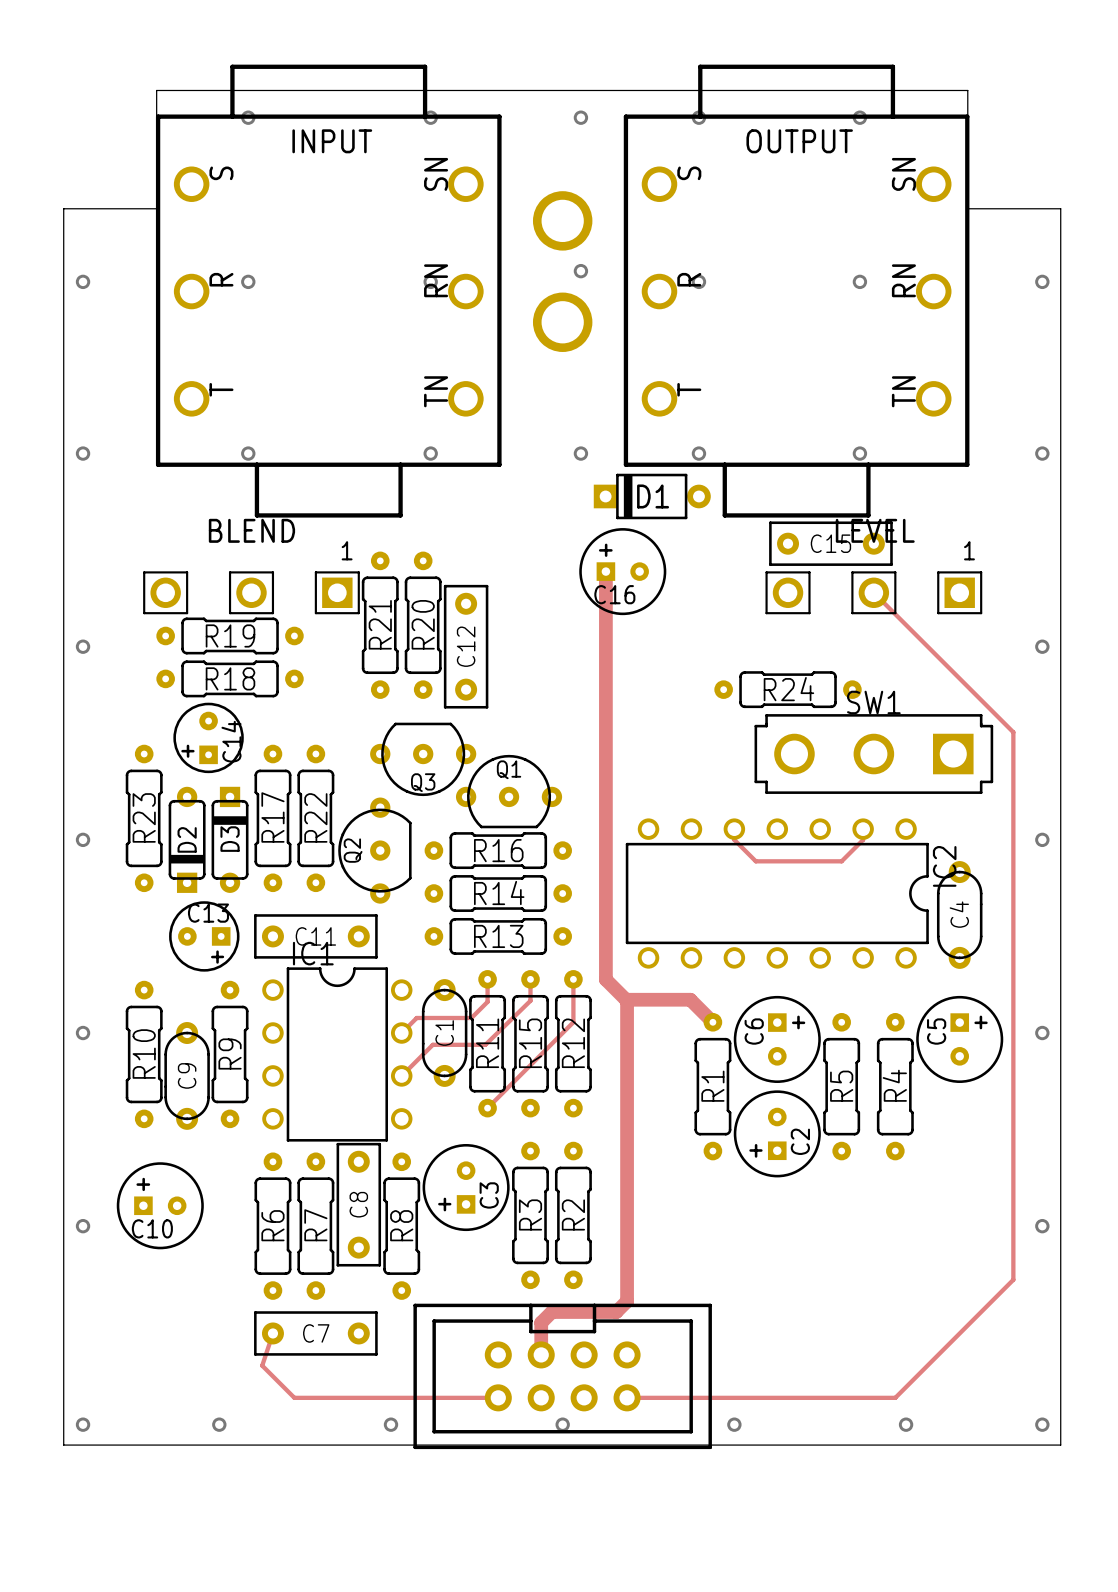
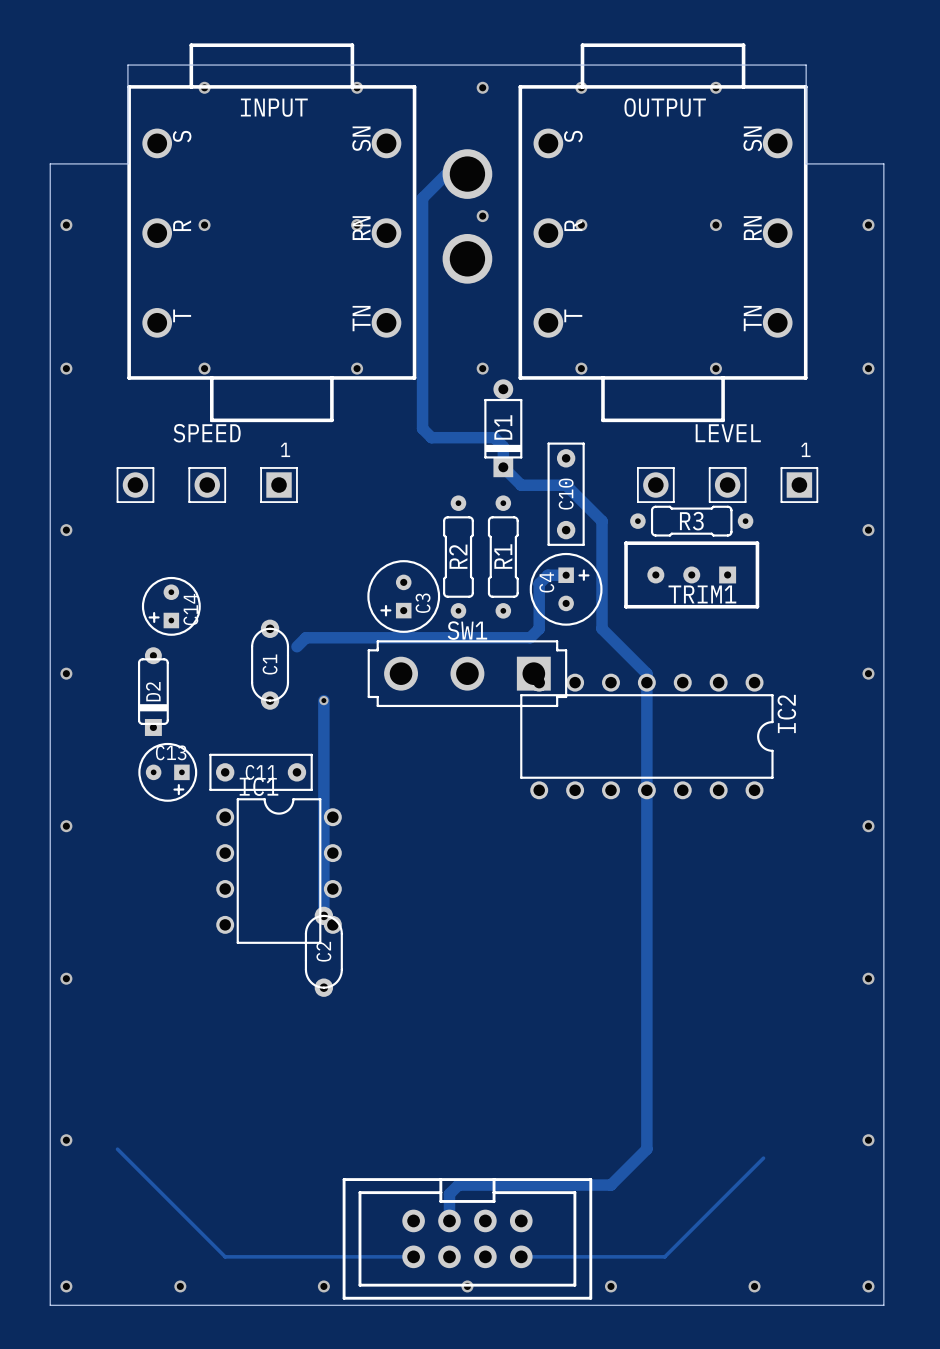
drawing: [63, 90, 1061, 1446] -> none
drawing: none -> [50, 65, 884, 1306]
track: none -> (467, 174) (446, 174) (422, 198) (422, 428) (431, 437) (494, 437) (503, 446) (503, 467) (521, 485) (566, 485) (602, 521) (602, 628) (646, 673) (646, 1149) (610, 1185) (458, 1185) (449, 1194) (449, 1220)
D1 rotation: 0° (652, 496) -> 90° counterclockwise (503, 428)
BLEND name: BLEND (251, 530) -> SPEED (207, 433)
C15: (830, 543) -> none
track: (605, 571) (605, 979) (627, 1000) (627, 1301) (616, 1312) (551, 1312) (541, 1322) (541, 1354) -> none
C16: (622, 571) -> none
track: (873, 592) (1013, 732) (1013, 1279) (895, 1397) (627, 1397) -> none
R21: (380, 625) -> none
R20: (423, 625) -> none
R19: (230, 635) -> none
C12: (466, 646) -> none
R18: (230, 678) -> none
R24: (788, 689) -> none
track: none -> (566, 575) (547, 575) (539, 583) (539, 628) (530, 637) (305, 637) (296, 646)
TRIM1: none -> (691, 574)
SW1 position: (873, 754) -> (467, 673)
Q3: (423, 759) -> none
Q1: (509, 791) -> none
R23: (144, 818) -> none
R17: (272, 818) -> none
R22: (315, 818) -> none
track: (734, 829) (734, 839) (755, 861) (841, 861) (863, 839) (863, 829) -> none
via position: (83, 839) -> (66, 673)
D3: (230, 839) -> none
via position: (1042, 839) -> (868, 673)
Q2: (374, 850) -> none
track: none -> (323, 700) (323, 915)
via: none -> (323, 700)
R16: (498, 850) -> none
C4 footprint: [936, 861, 983, 969] -> [529, 552, 603, 626]
R14: (498, 893) -> none
R13: (498, 936) -> none
track: (487, 979) (487, 1001) (471, 1017) (416, 1017) (401, 1033) -> none
track: (530, 979) (530, 1000) (485, 1044) (432, 1044) (401, 1075) -> none
track: (573, 979) (573, 1022) (487, 1108) -> none
track: (625, 999) (690, 999) (712, 1022) -> none
via position: (83, 1033) -> (66, 826)
C1 rotation: 0° (444, 1033) -> 180° (270, 664)
C1 position: (444, 1033) -> (270, 664)
via position: (1042, 1033) -> (868, 826)
C6: (777, 1039) -> none
C5: (959, 1039) -> none
R11: (487, 1043) -> none
R15: (530, 1043) -> none
R12: (573, 1043) -> none
R10: (144, 1054) -> none
R9: (230, 1054) -> none
C9: (187, 1075) -> none
R1 position: (712, 1086) -> (503, 557)
R5: (841, 1086) -> none
R4: (895, 1086) -> none
C2 footprint: [733, 1090, 821, 1178] -> [304, 906, 343, 997]
C10 footprint: [116, 1162, 204, 1250] -> [547, 442, 585, 546]
C3 position: (466, 1187) -> (403, 596)
C8: (358, 1204) -> none
R3 rotation: 0° (530, 1215) -> 90° clockwise (691, 521)
R3 position: (530, 1215) -> (691, 521)
R2 position: (573, 1215) -> (458, 557)
via position: (83, 1226) -> (66, 978)
R6: (272, 1226) -> none
R7: (315, 1226) -> none
R8: (401, 1226) -> none
via position: (1042, 1226) -> (868, 978)
track: (272, 1333) (262, 1365) (294, 1397) (498, 1397) -> none
C7: (315, 1333) -> none
part position: (562, 1376) -> (467, 1238)
track: none -> (117, 1149) (225, 1256) (413, 1256)
track: none -> (763, 1158) (664, 1256) (521, 1256)
via position: (83, 1424) -> (66, 1140)
via: (219, 1424) -> none
via: (390, 1424) -> none
via: (562, 1424) -> none
via: (734, 1424) -> none
via: (906, 1424) -> none
via position: (1042, 1424) -> (868, 1140)
via: none -> (66, 1286)
via: none -> (180, 1286)
via: none -> (323, 1286)
via: none -> (467, 1286)
via: none -> (610, 1286)
via: none -> (754, 1286)
via: none -> (868, 1286)

